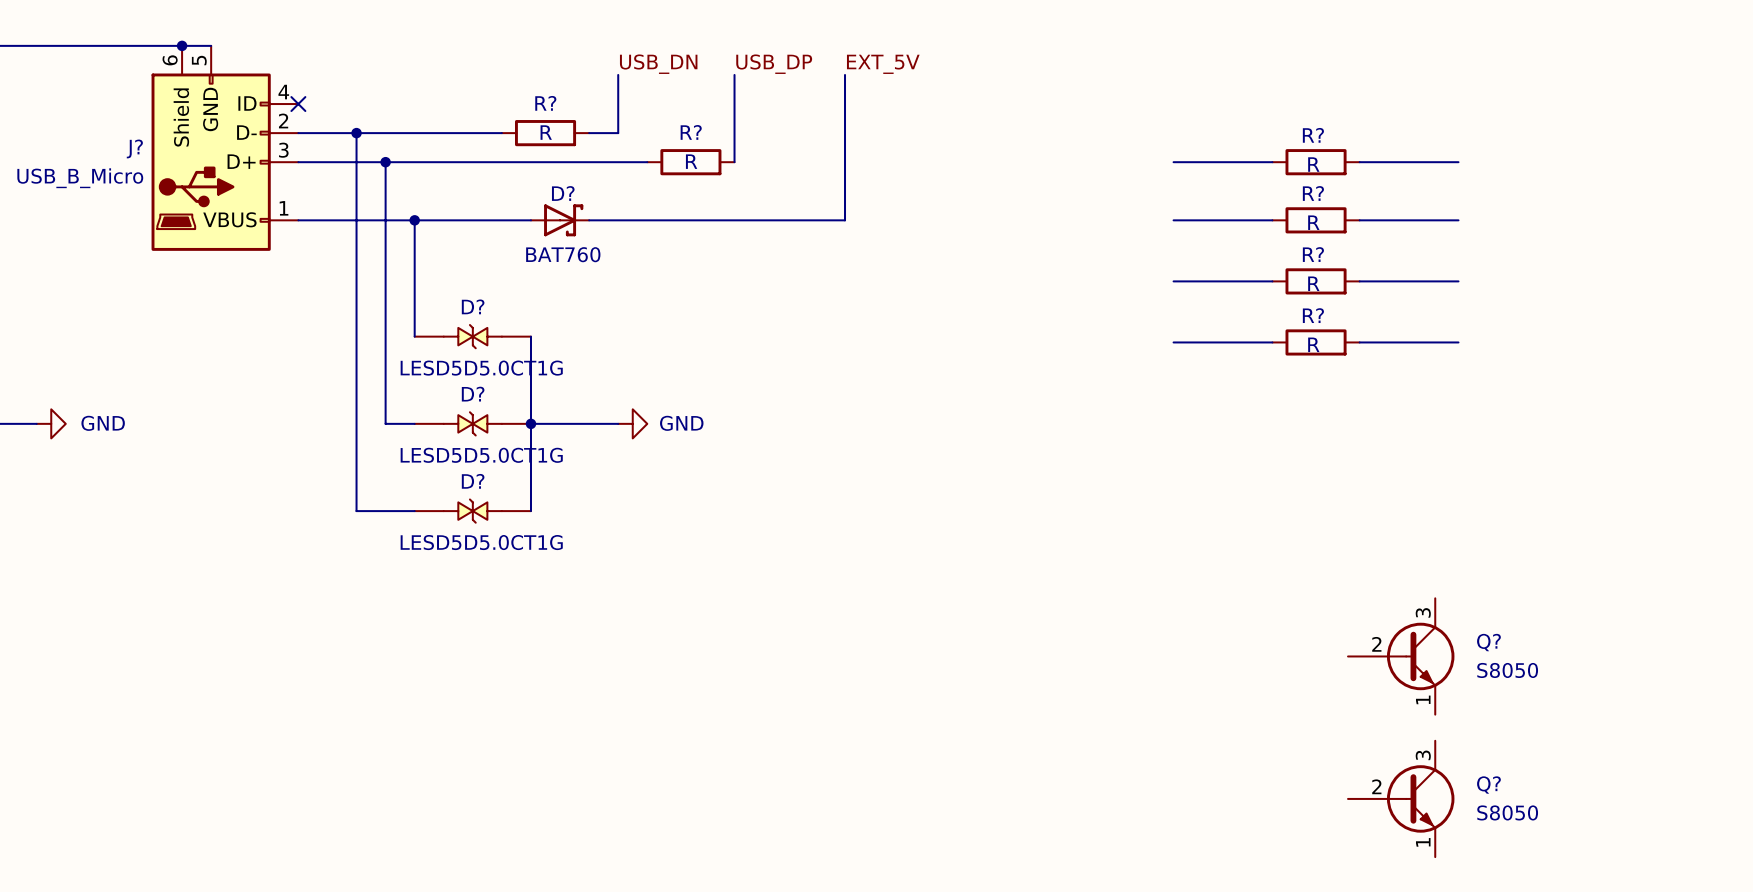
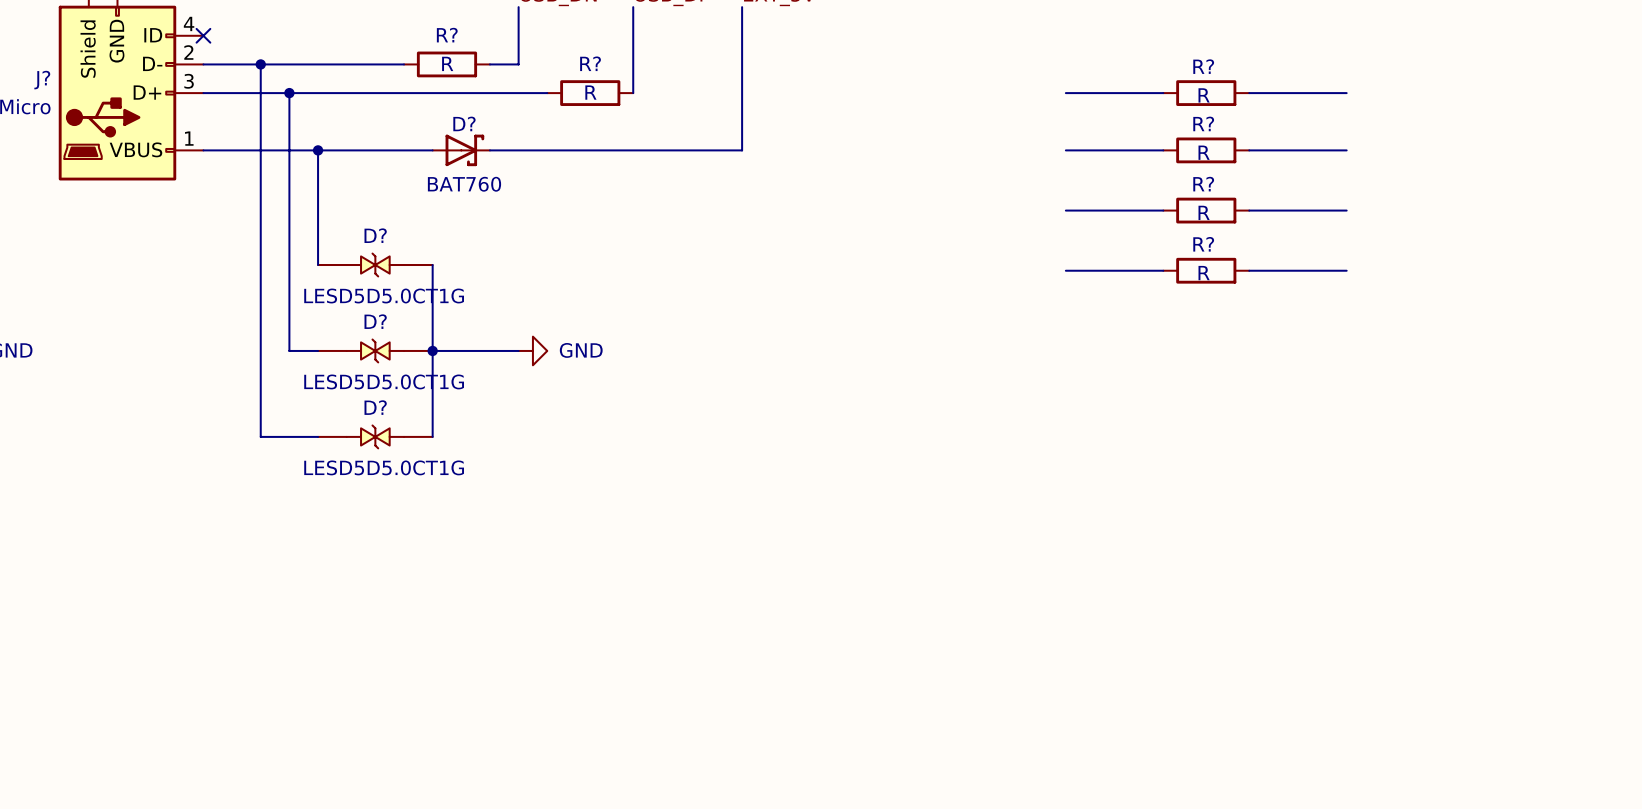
Q?: S8050 (1401, 656) -> none
Q?: S8050 (1401, 798) -> none

